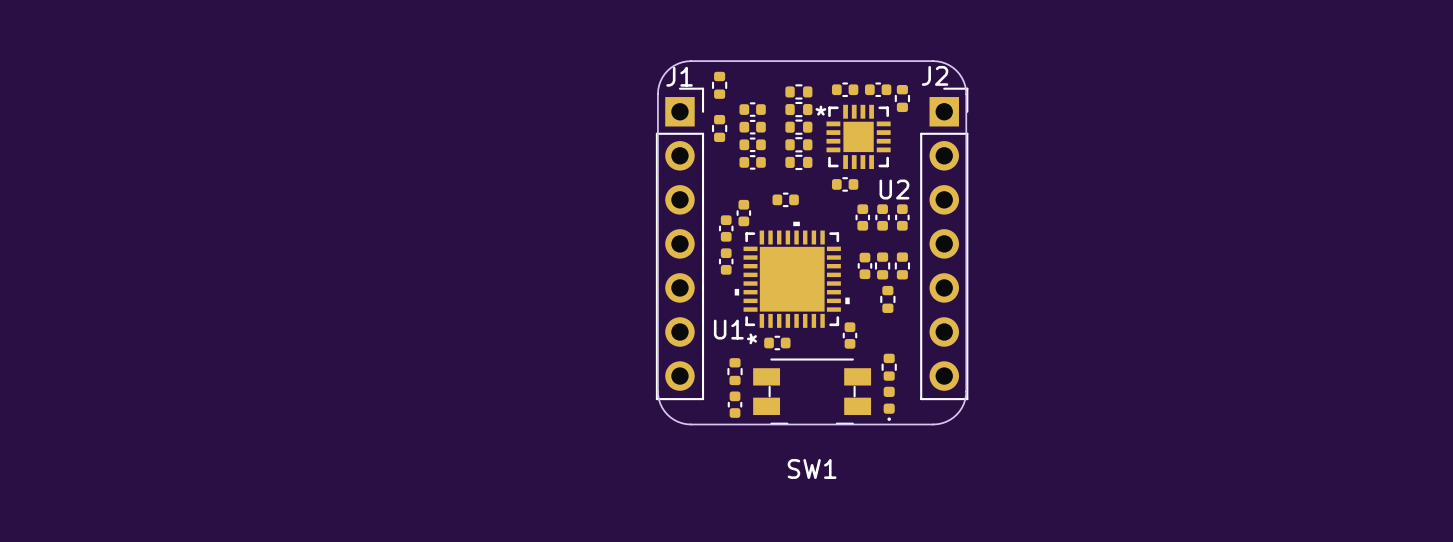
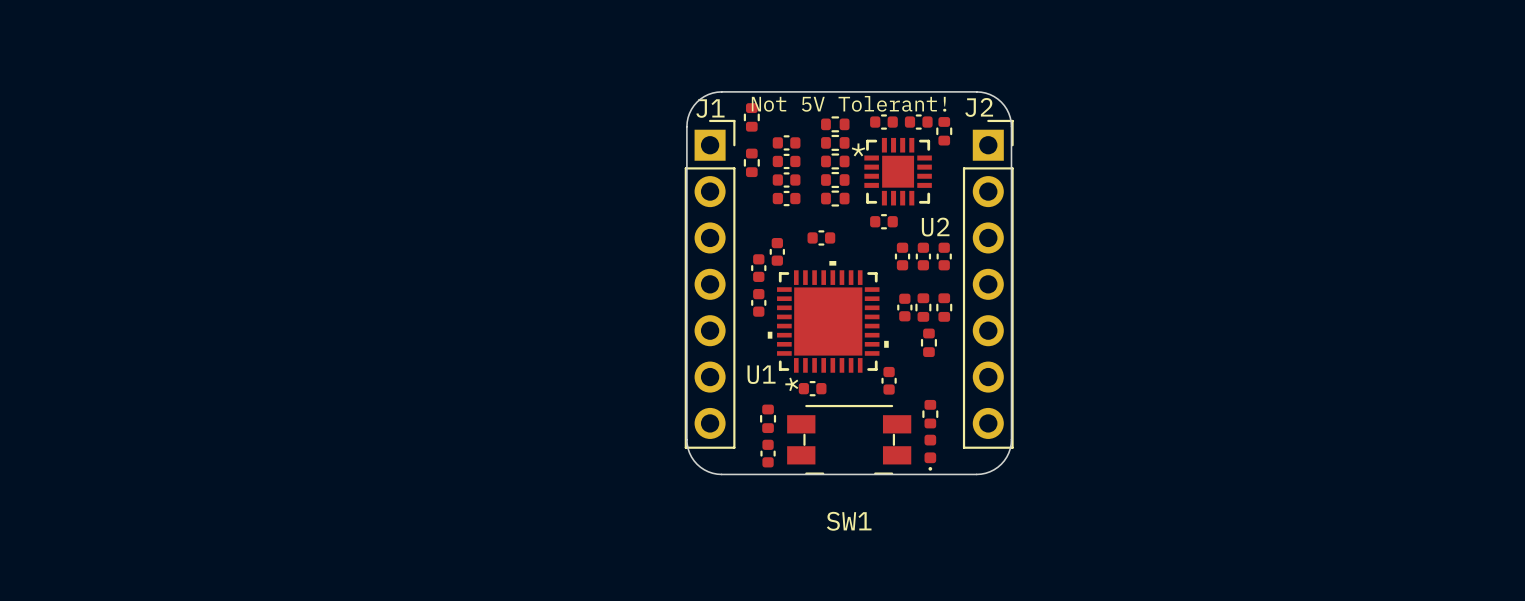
text: none -> Not 5V Tolerant! (849, 103)

